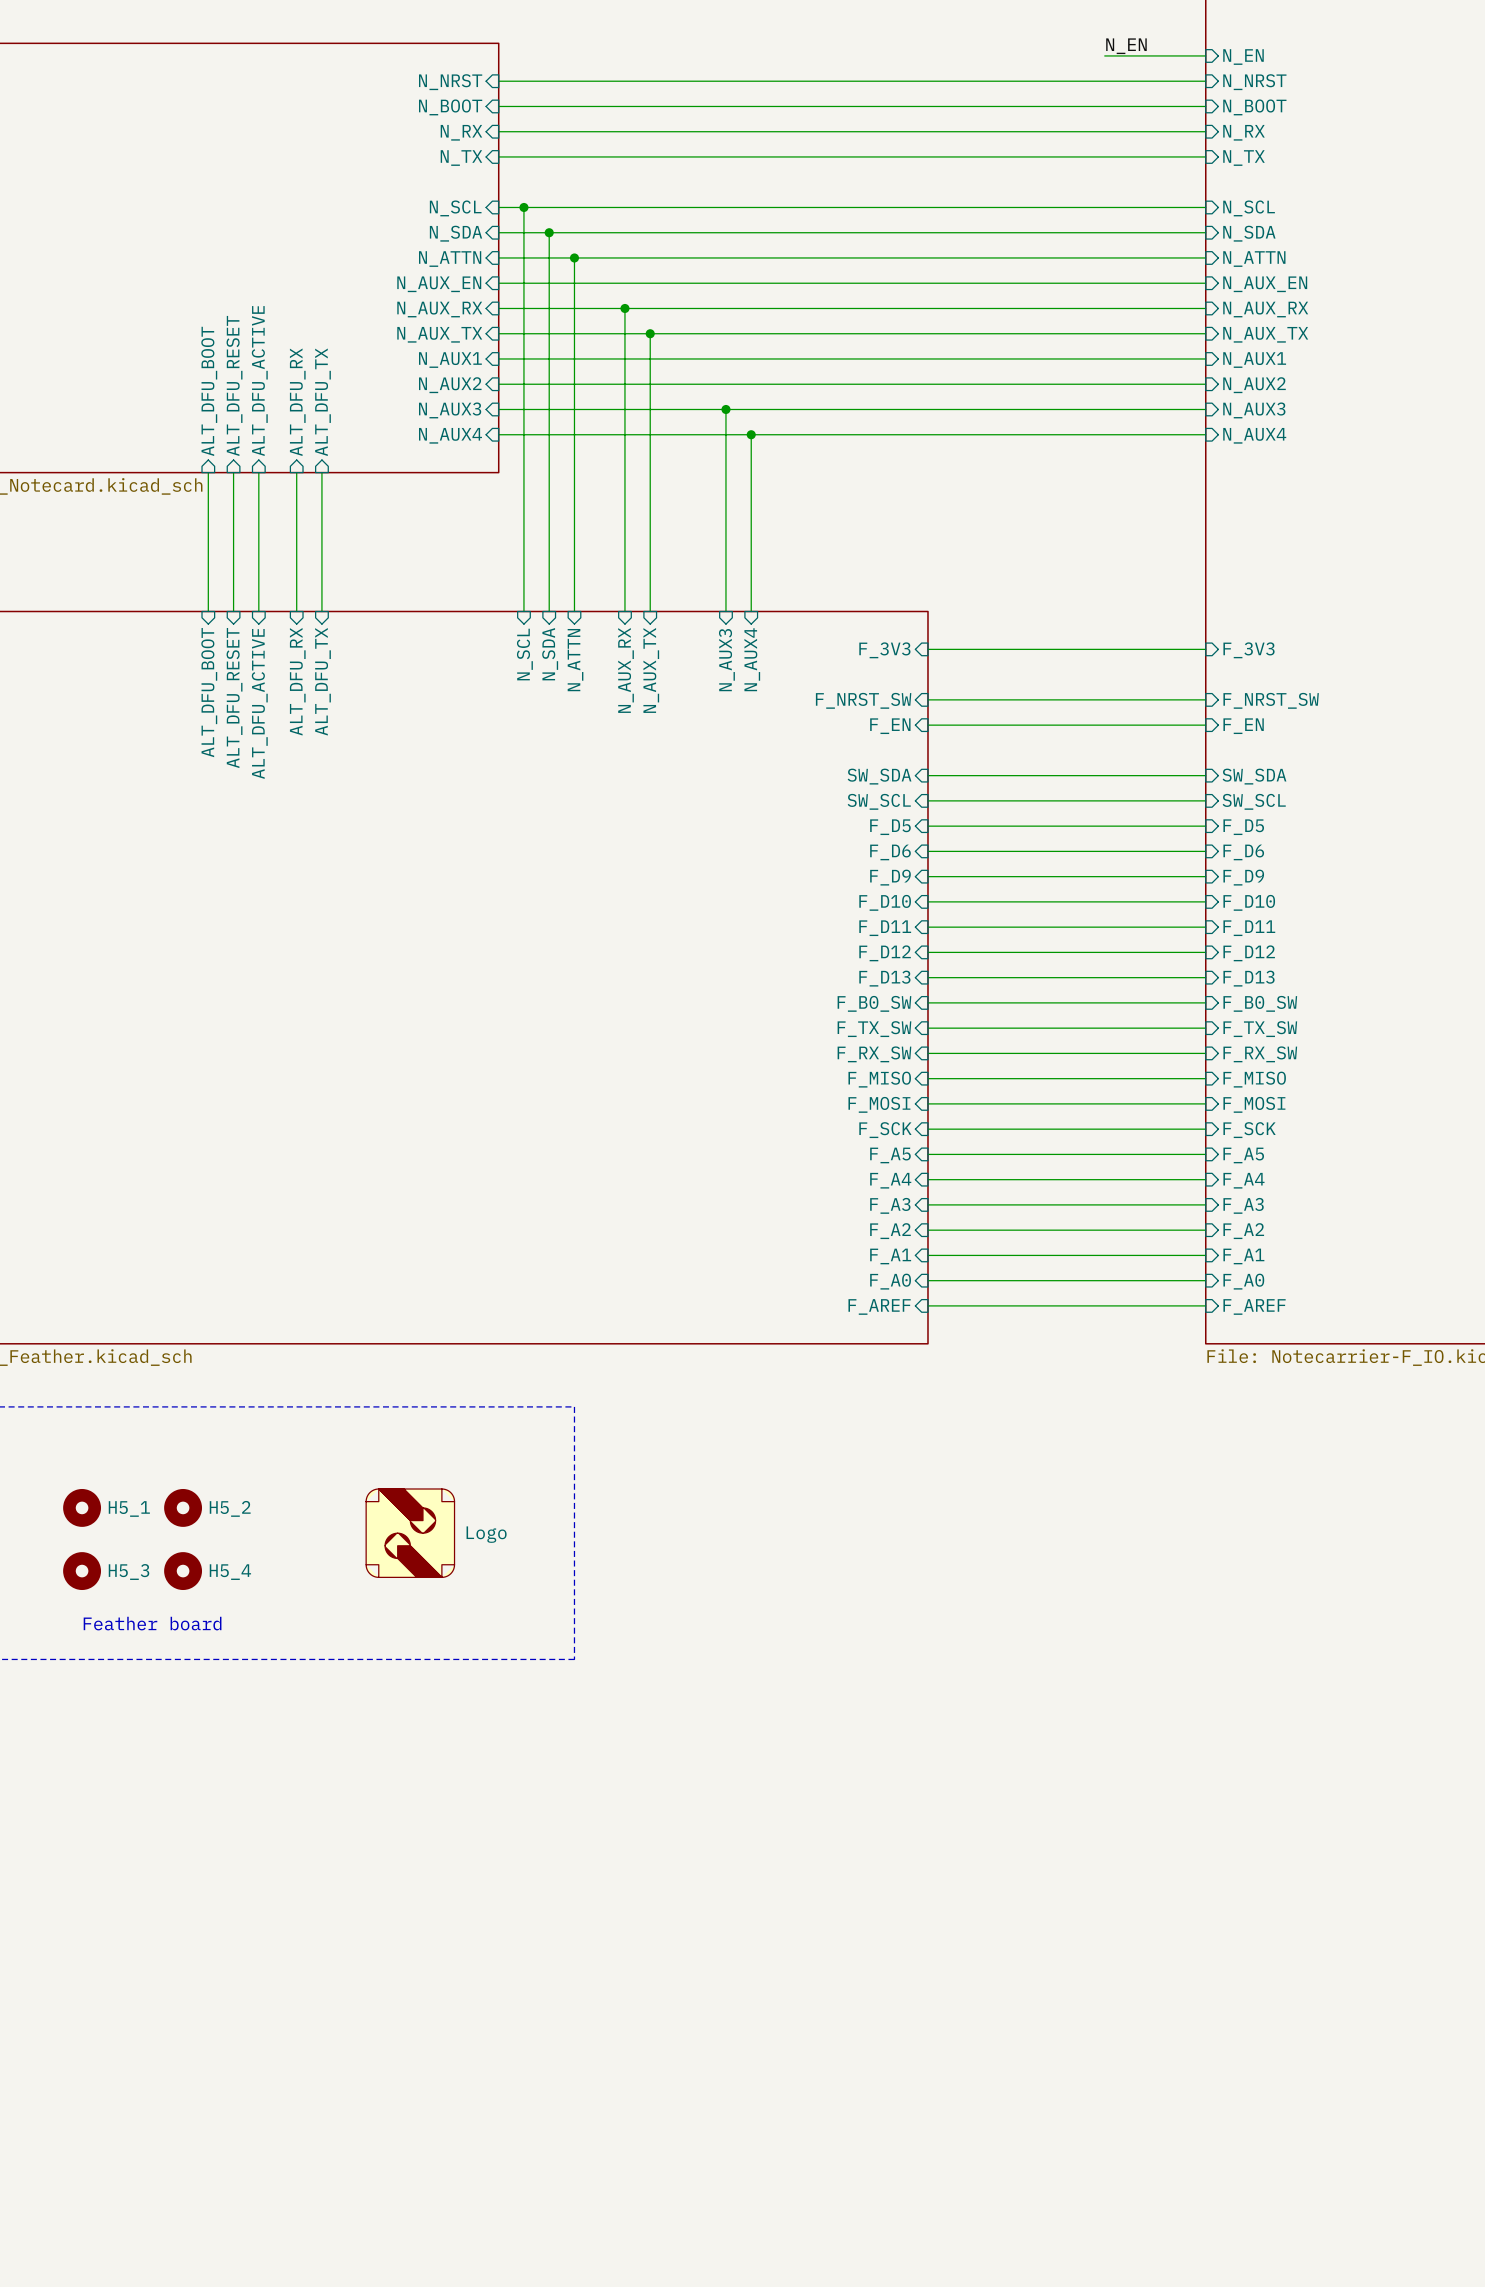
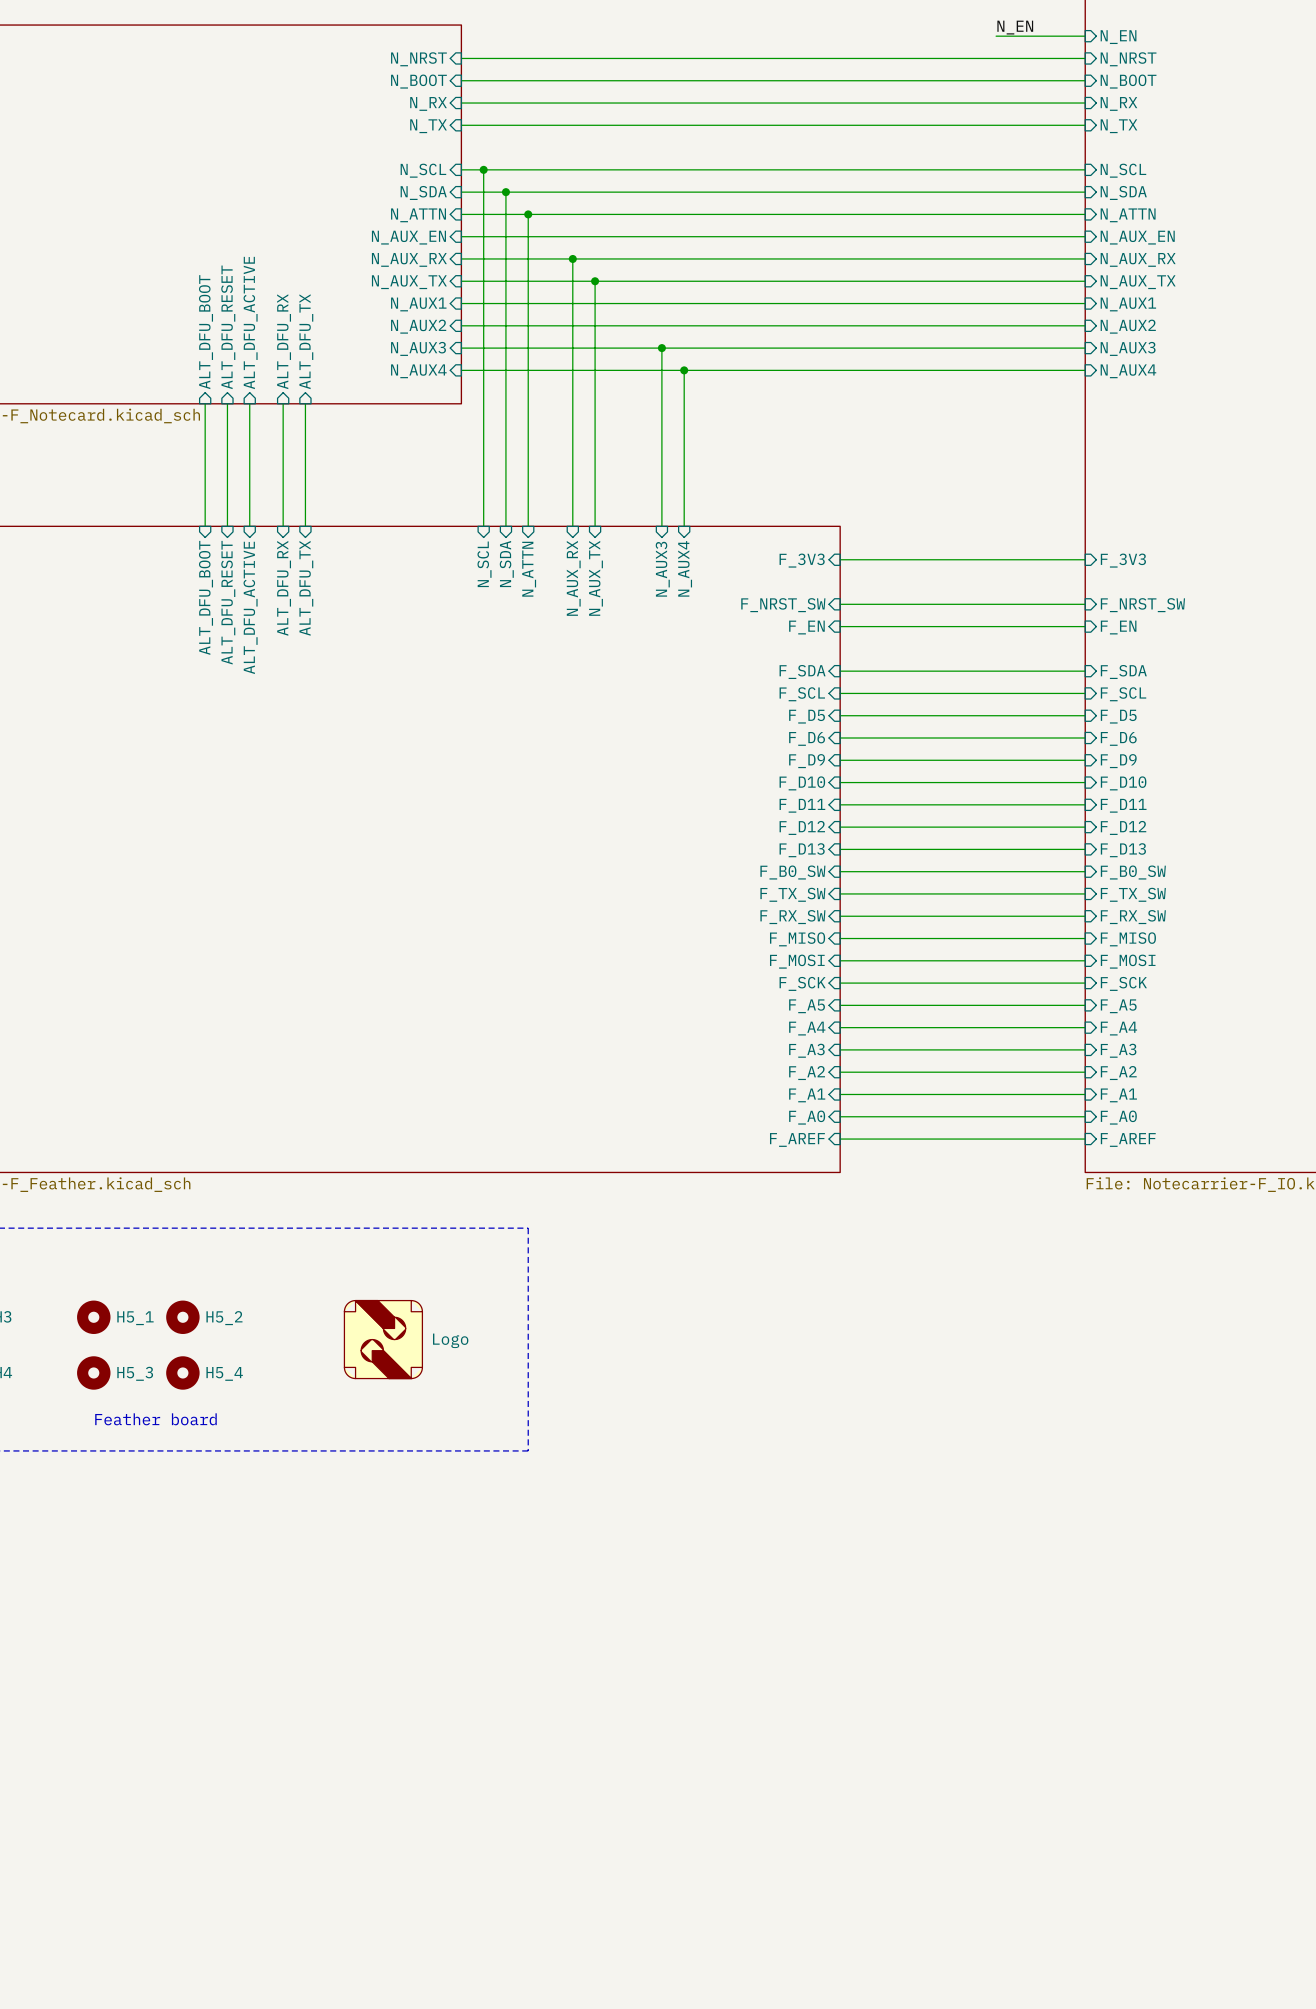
sheet pin: SW_SDA (879, 776) -> F_SDA (802, 671)
sheet pin: SW_SDA (1254, 776) -> F_SDA (1123, 671)
sheet pin: SW_SCL (879, 801) -> F_SCL (802, 694)
sheet pin: SW_SCL (1254, 801) -> F_SCL (1123, 694)

